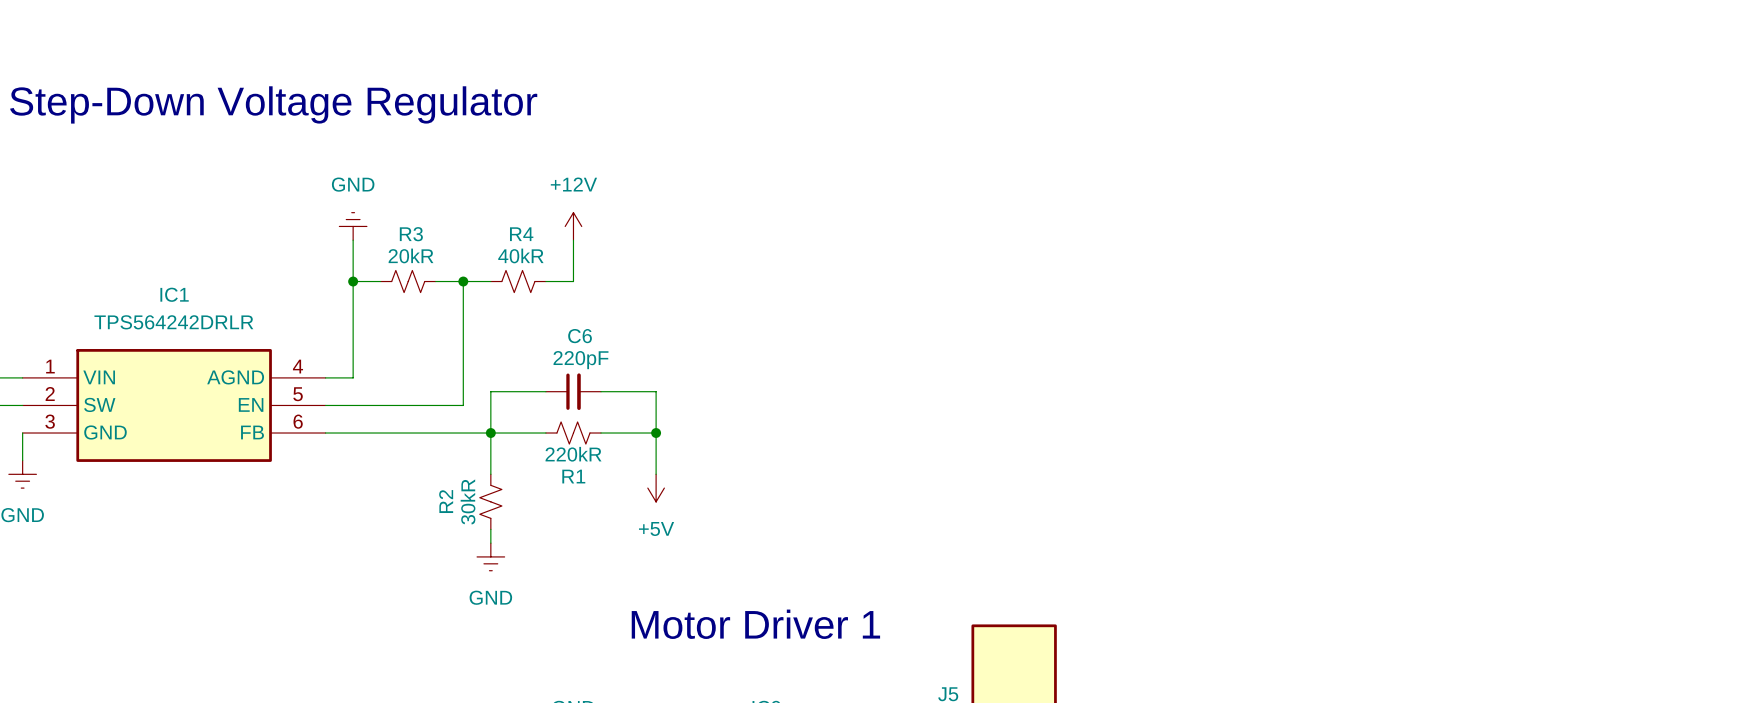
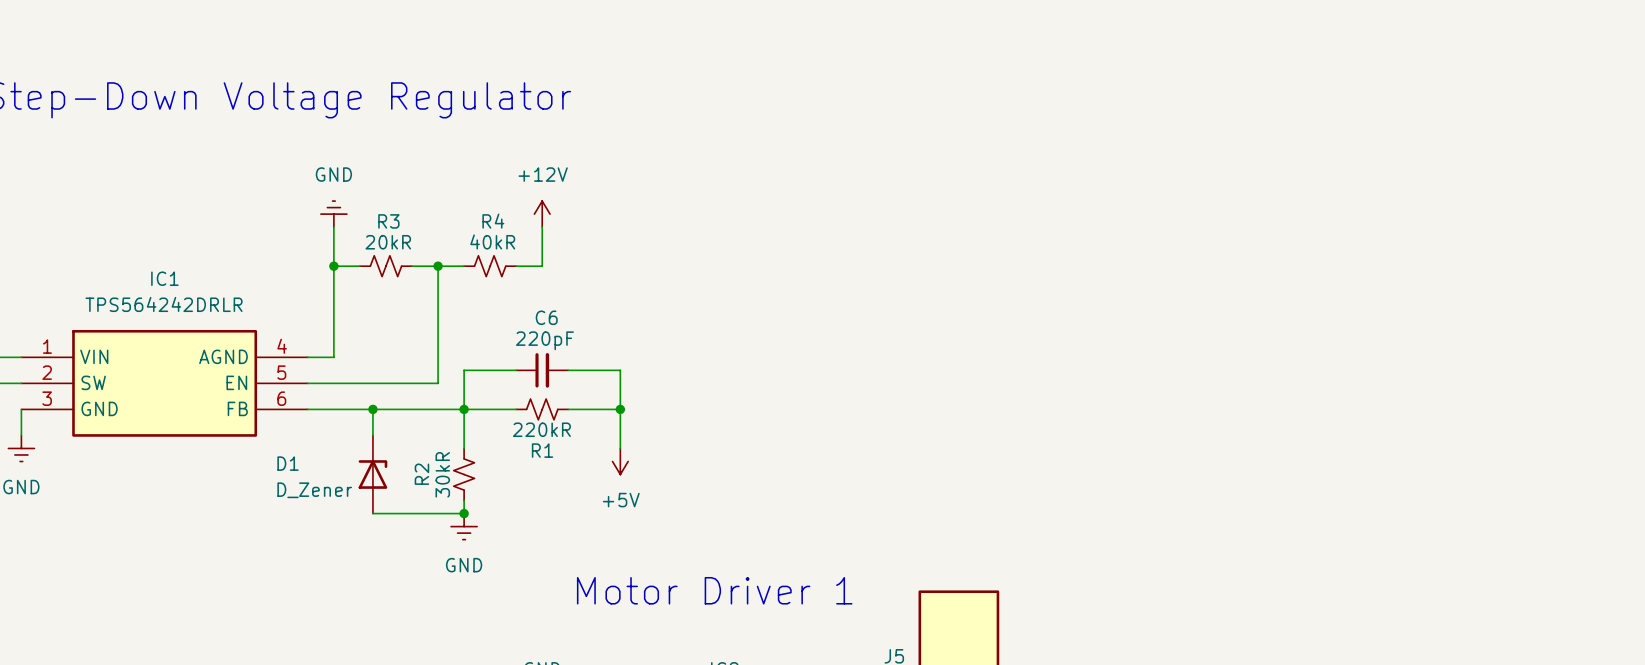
wire: none -> (372, 409) (372, 435)
junction: none -> (372, 409)
D1: none -> D_Zener (372, 474)
wire: none -> (372, 513) (464, 513)
junction: none -> (464, 513)

